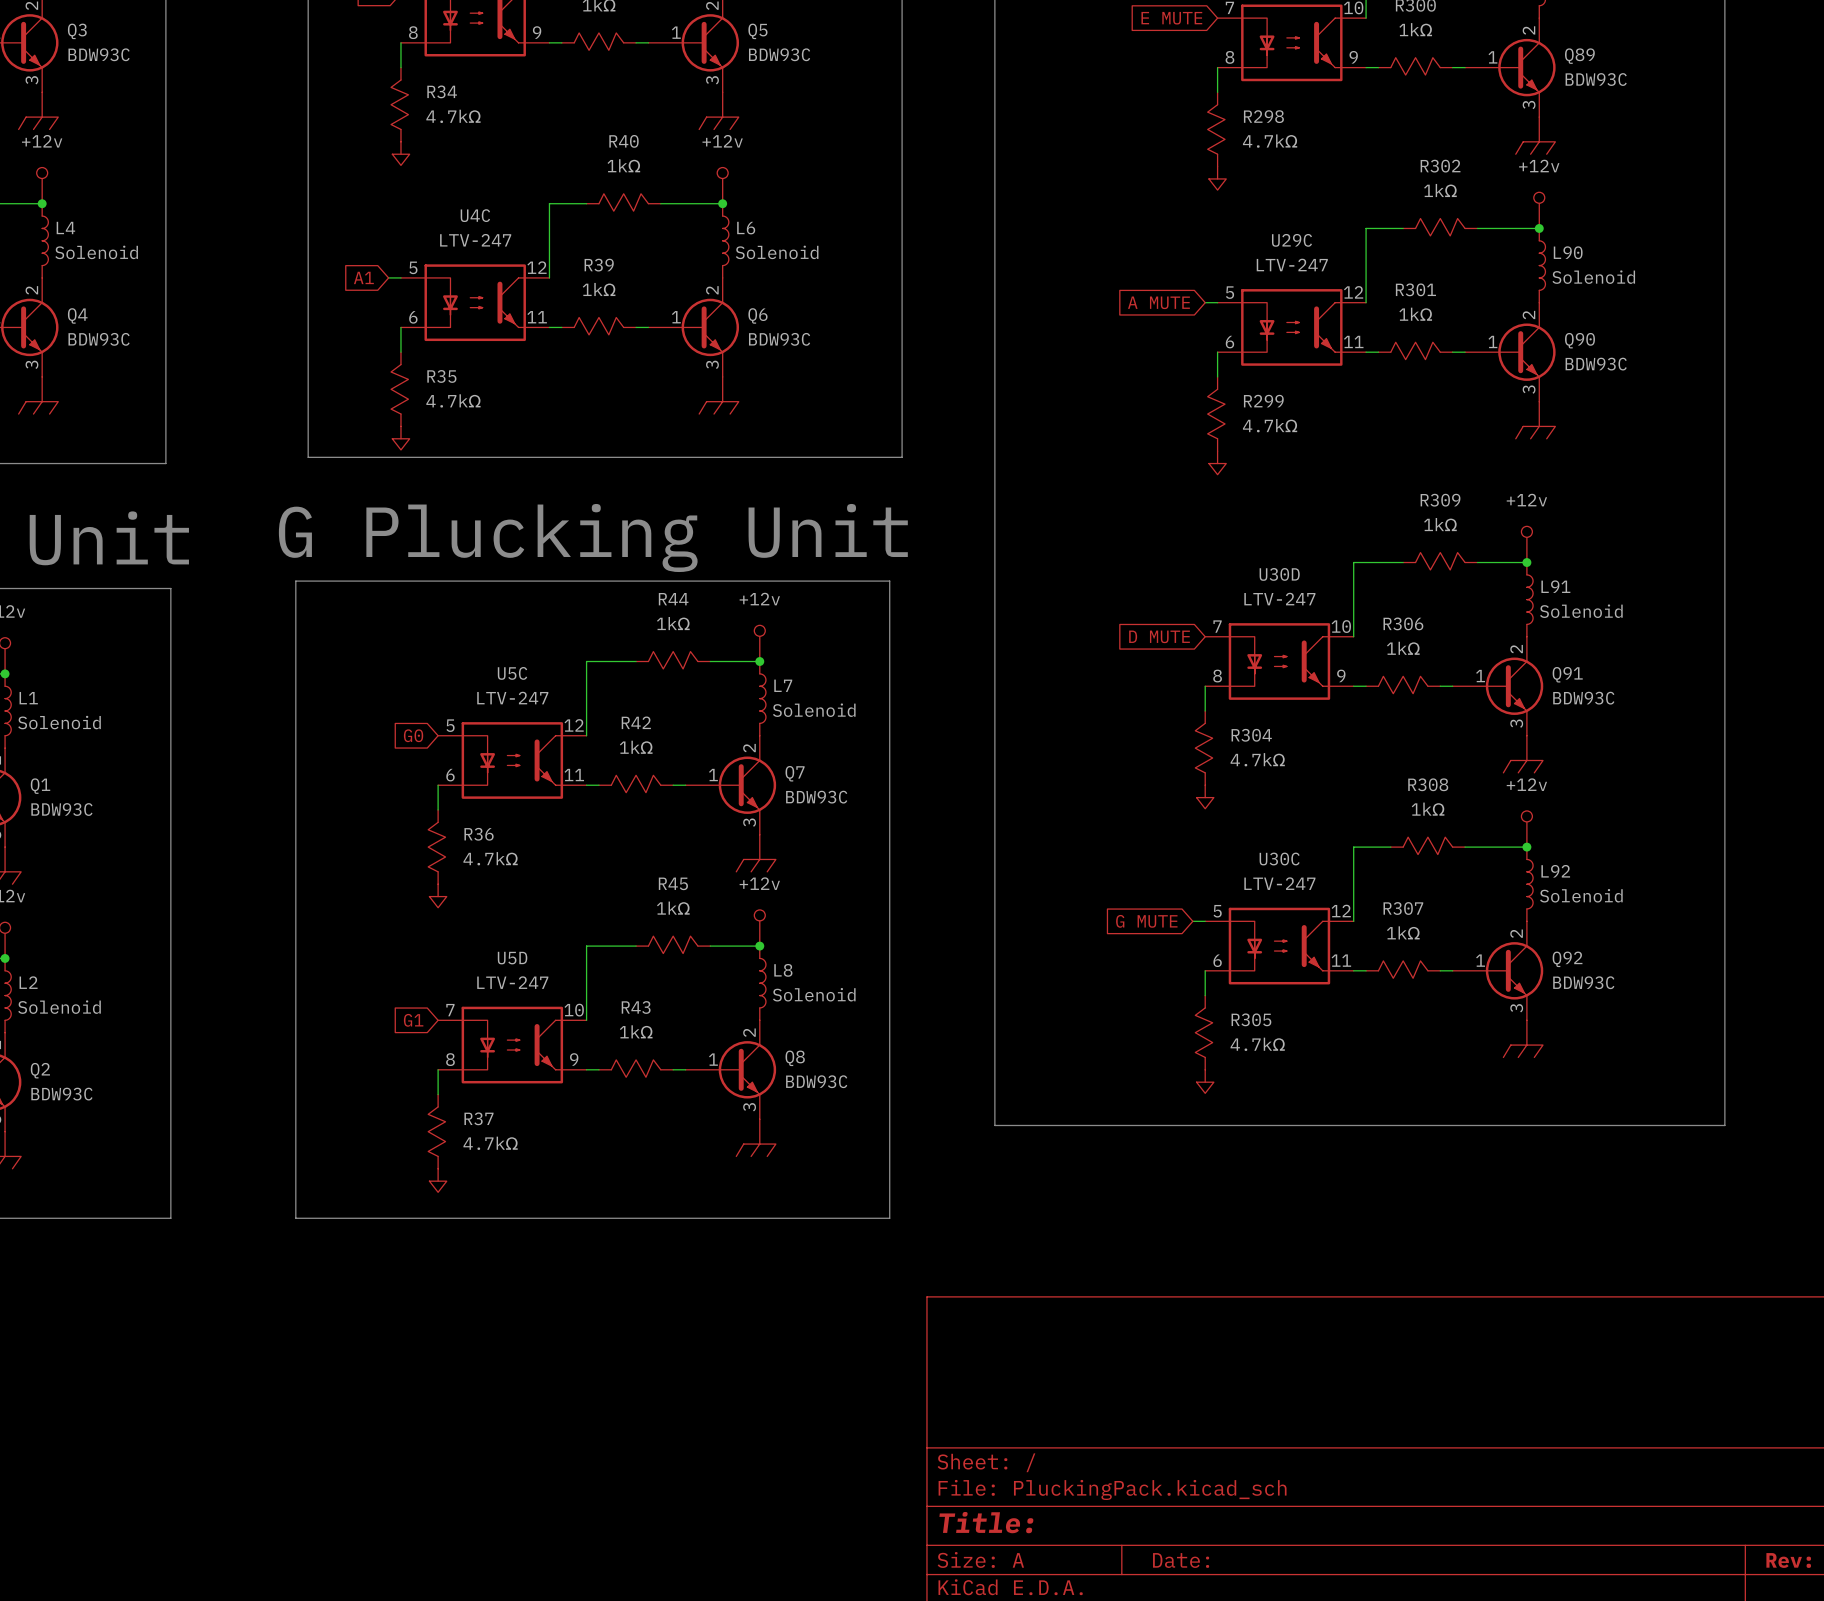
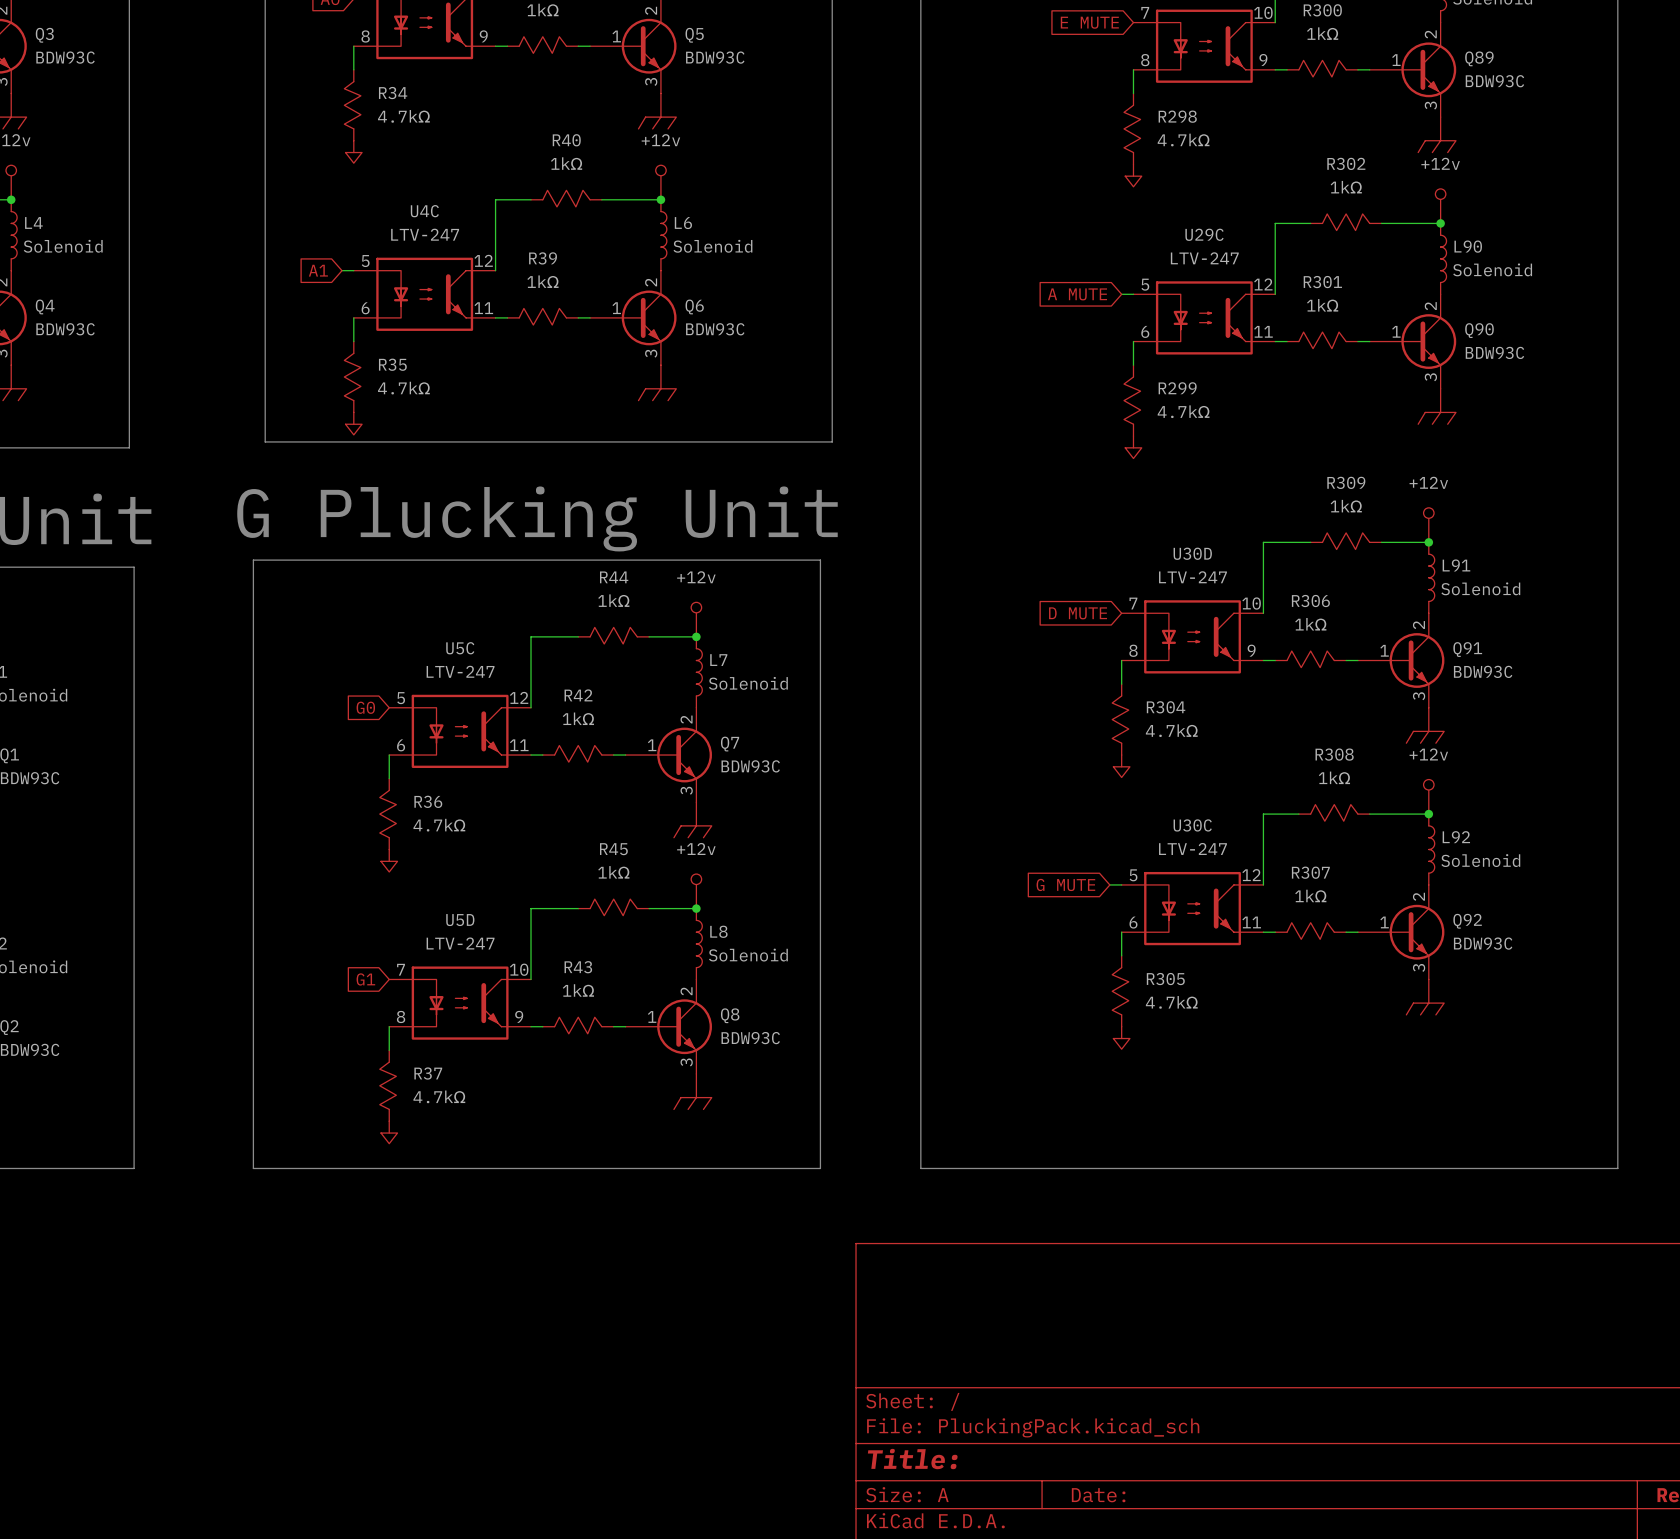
line: (994, 1125) (1724, 1125) -> (920, 1079) (920, 1168) (1617, 1168) (1617, 1079)

